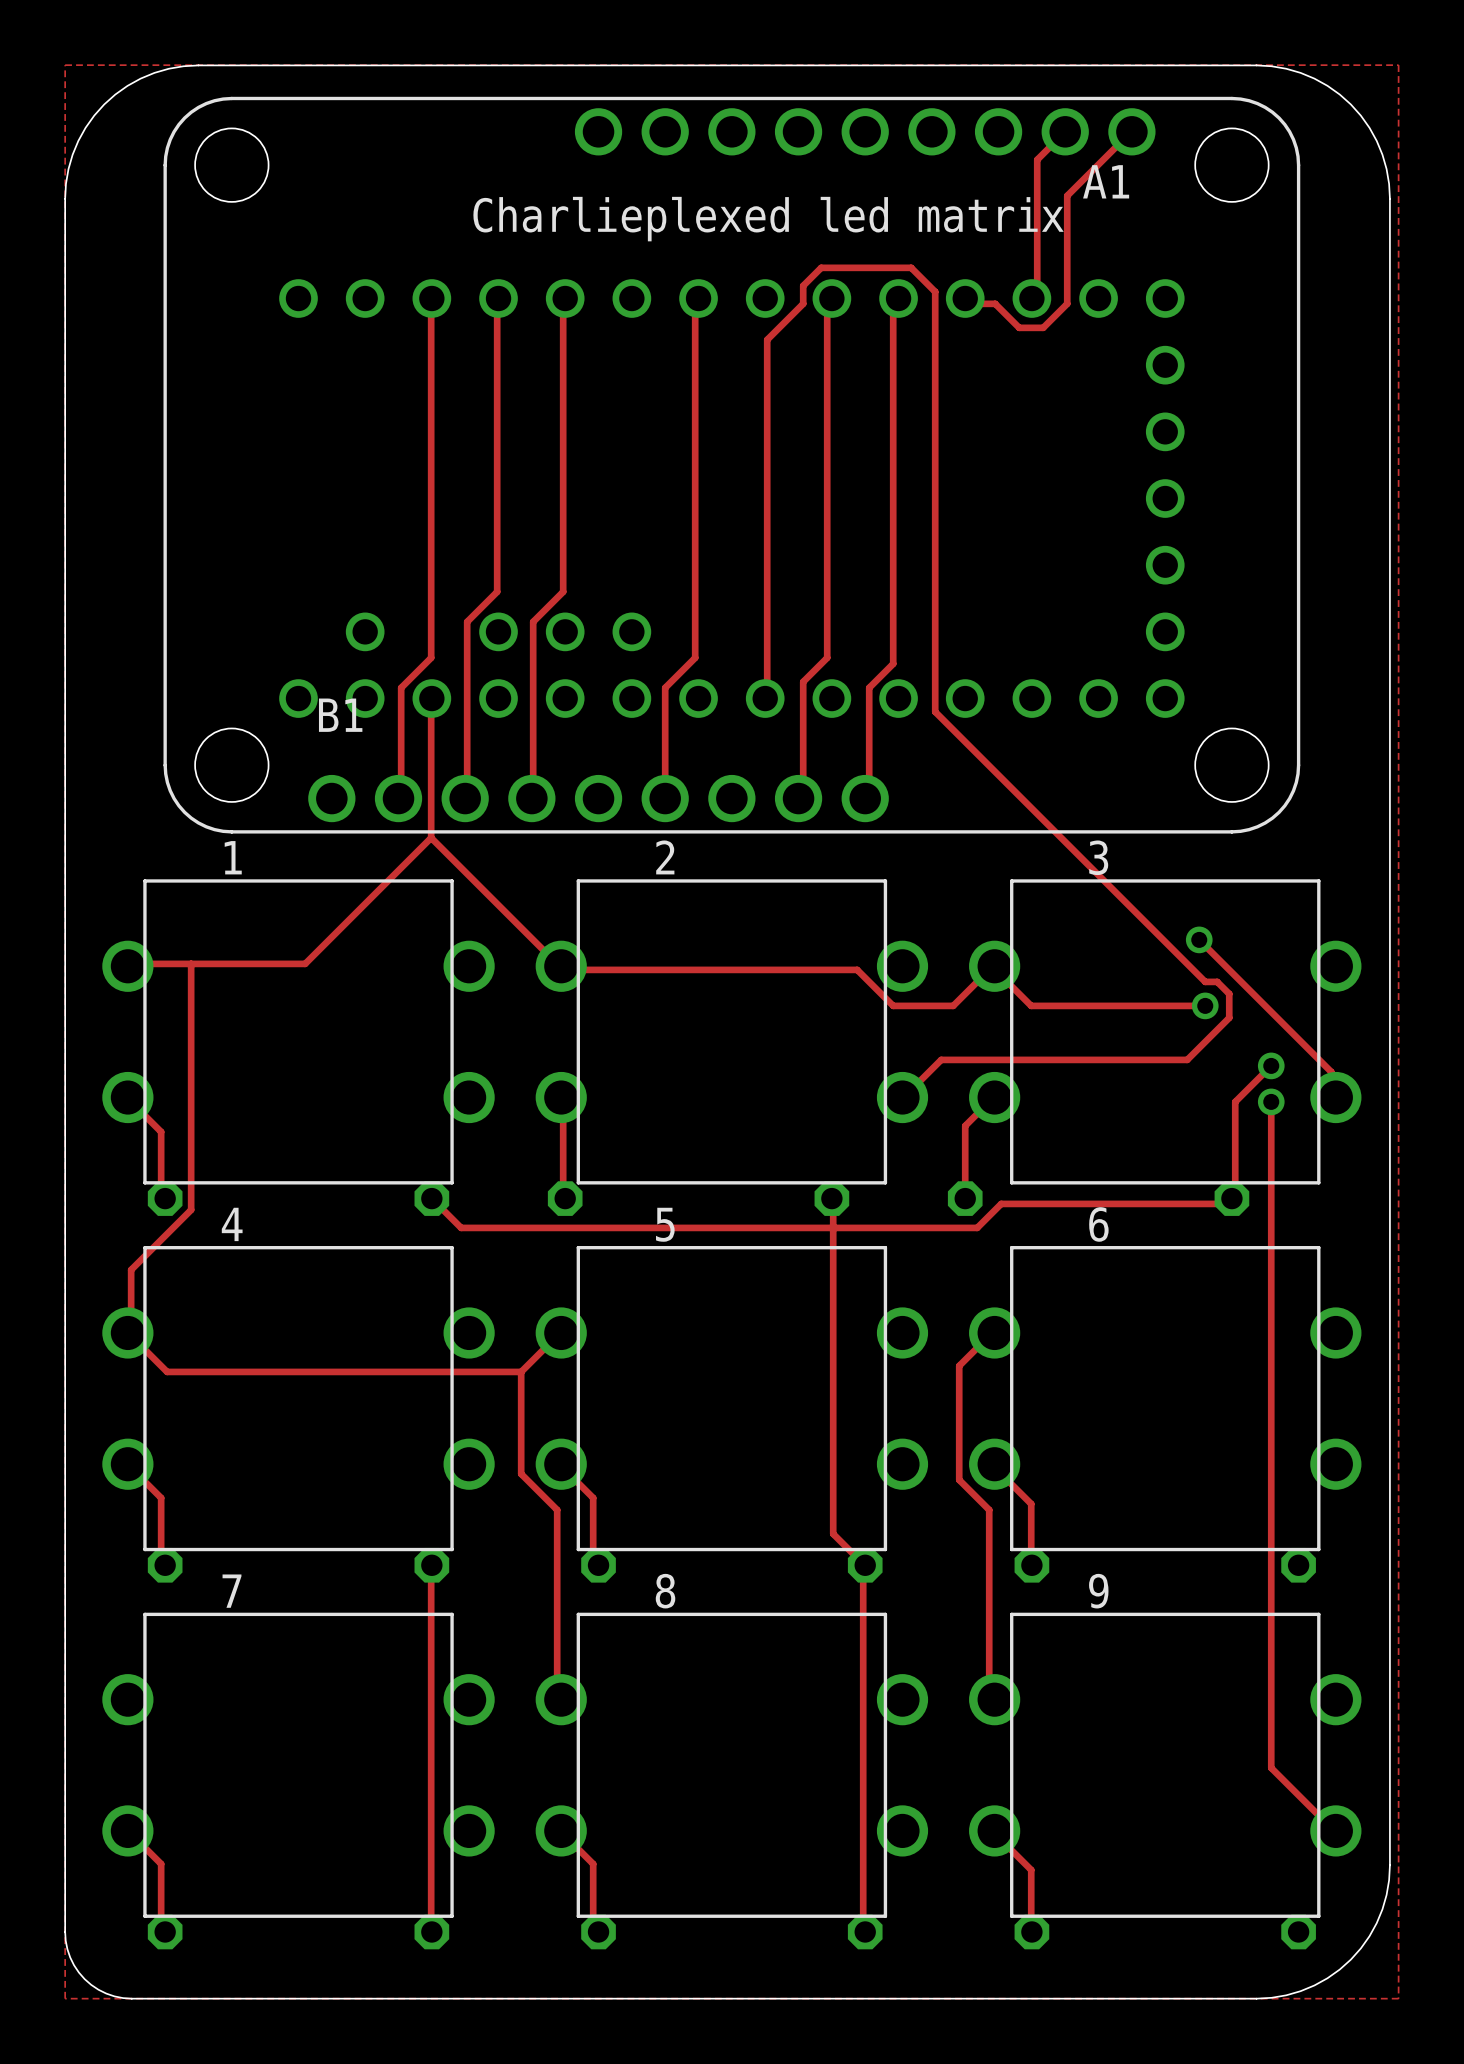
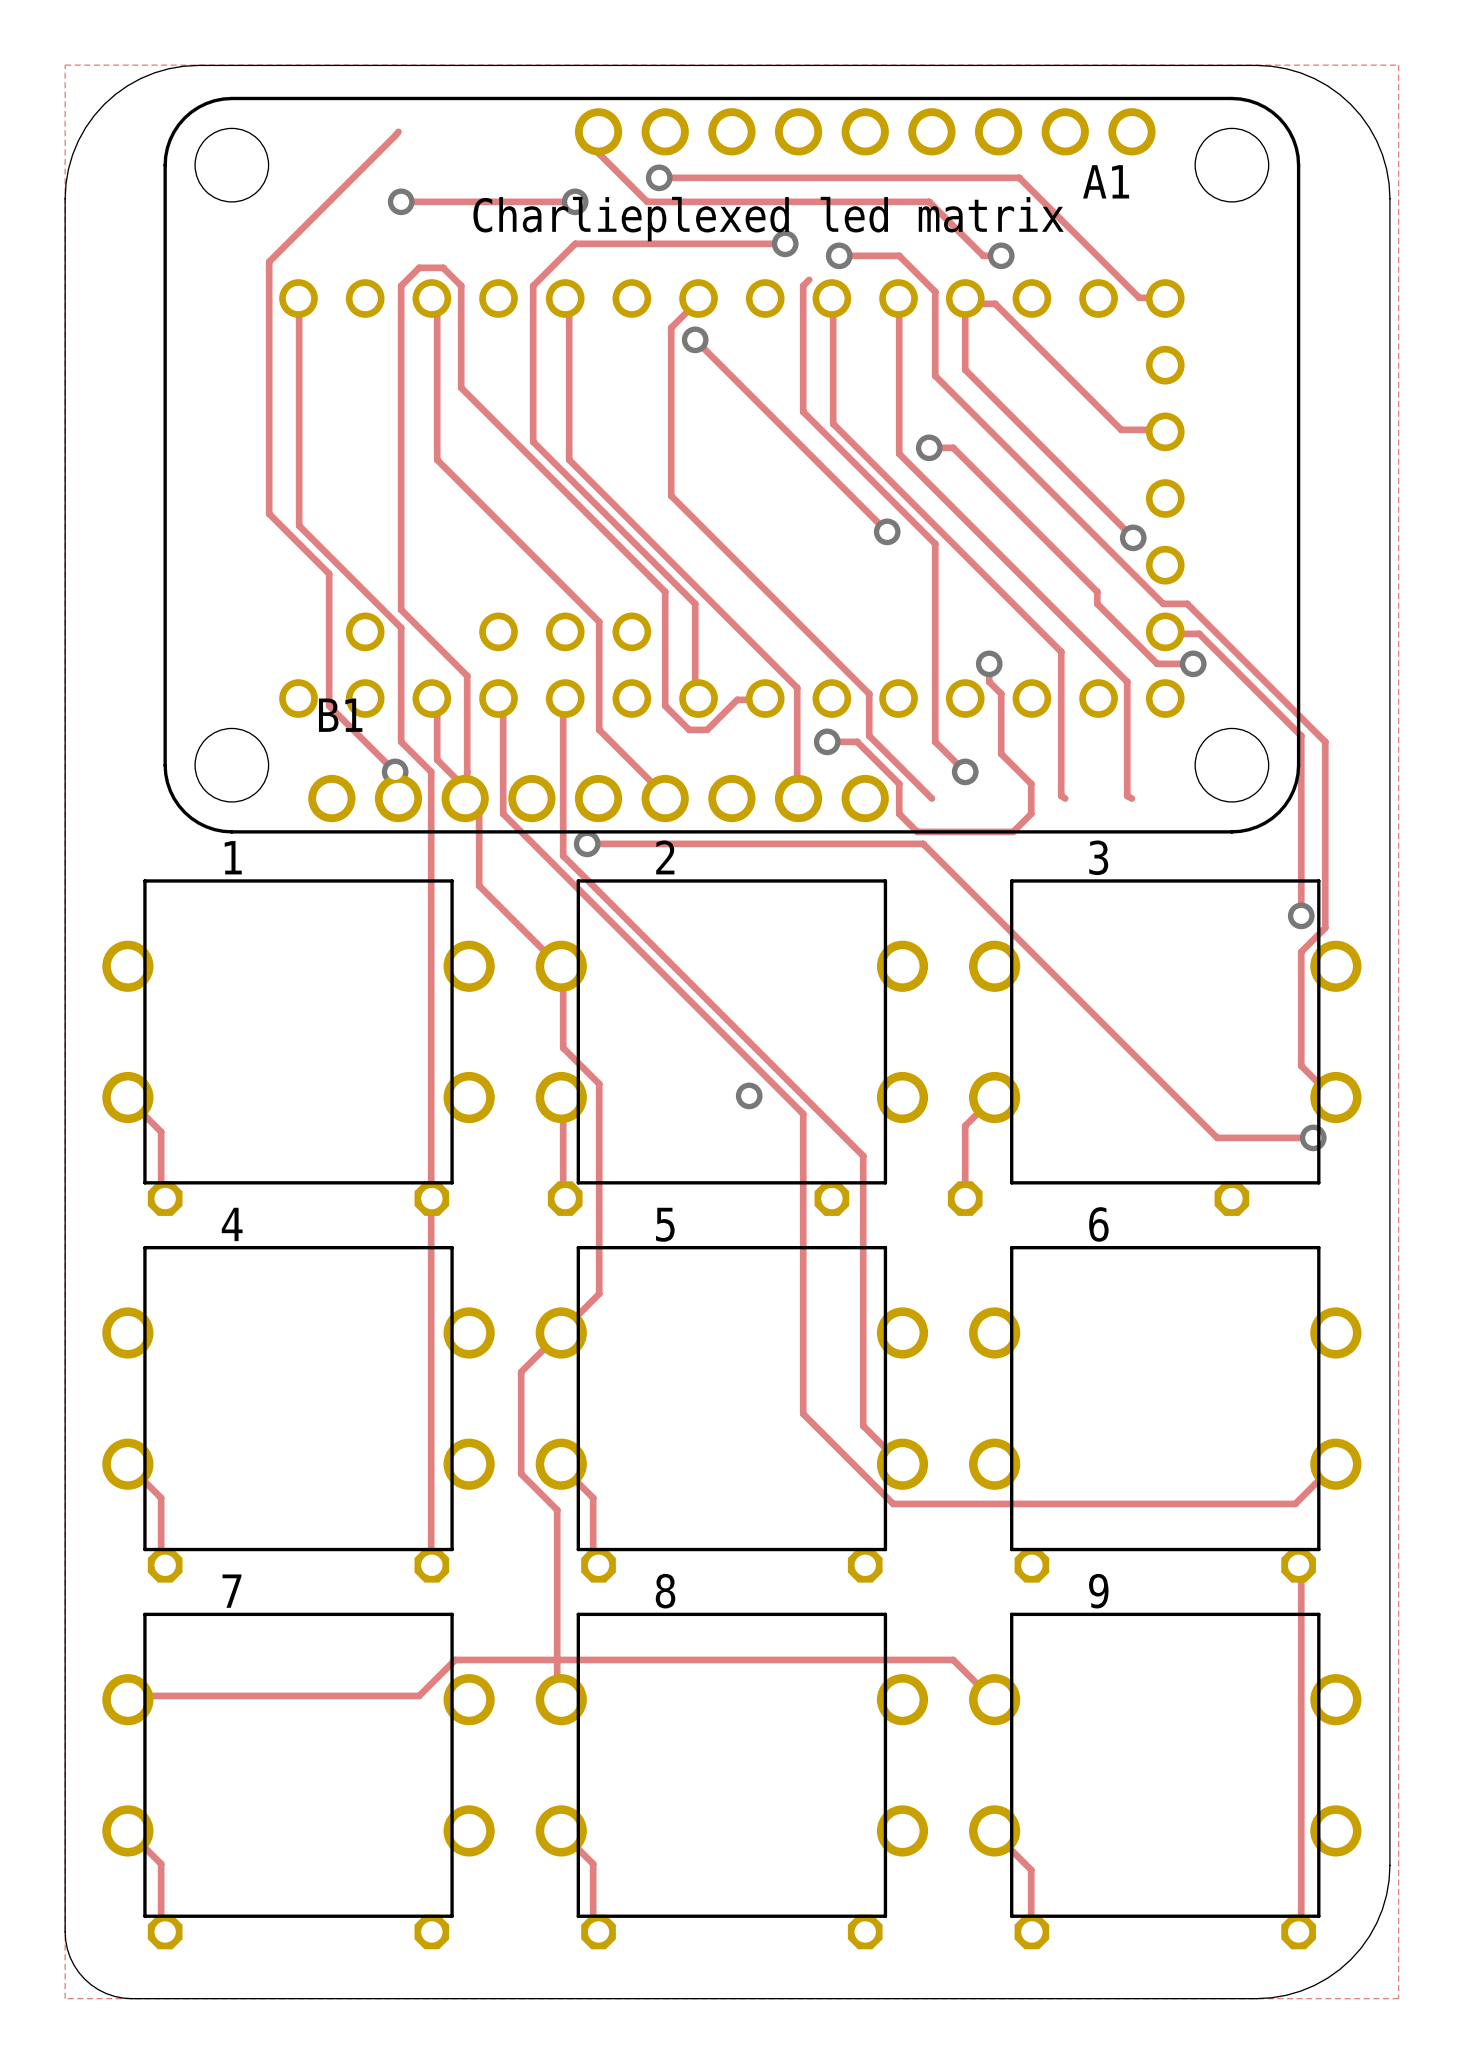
track: none -> (398, 131) (269, 261) (269, 513) (329, 573) (329, 705) (395, 771)
track: none -> (598, 131) (599, 153) (647, 201) (929, 201) (983, 255) (1001, 255)
track: (1065, 131) (1037, 159) (1037, 297) (1031, 298) -> none
track: (1131, 131) (1067, 195) (1067, 303) (1043, 327) (1019, 327) -> (1165, 431) (1163, 429) (1121, 429) (1019, 327)
track: none -> (659, 177) (1019, 177) (1139, 297) (1165, 298)
via: none -> (659, 177)
track: none -> (401, 201) (575, 201)
via: none -> (401, 201)
via: none -> (575, 201)
via: none -> (785, 243)
via: none -> (839, 255)
via: none -> (1001, 255)
track: (911, 267) (821, 267) (809, 279) -> (911, 267) (899, 255) (839, 255)
track: (431, 298) (431, 657) (401, 687) -> (298, 298) (299, 525) (401, 627) (401, 687)
track: none -> (431, 298) (437, 303) (437, 459) (599, 621) (599, 729) (665, 795)
track: (498, 298) (497, 591) (467, 621) (467, 675) -> (665, 687) (665, 591) (461, 387) (461, 285) (443, 267) (419, 267) (401, 285) (401, 609) (467, 675)
track: (565, 298) (563, 303) (563, 591) (533, 621) (531, 798) -> (565, 298) (569, 303) (569, 459) (797, 687) (798, 798)
track: (831, 298) (827, 303) (827, 657) (803, 681) (803, 795) (798, 798) -> (831, 298) (833, 423) (1061, 651) (1061, 795) (1065, 798)
track: (898, 298) (893, 303) (893, 663) (869, 687) (869, 693) -> (695, 303) (671, 327) (671, 495) (869, 693)
track: none -> (898, 298) (899, 453) (1127, 681) (1127, 795) (1131, 798)
track: (695, 303) (695, 603) -> (785, 243) (575, 243) (533, 285) (533, 441) (695, 603)
track: (803, 303) (767, 339) (767, 693) (765, 698) -> none
track: none -> (965, 303) (965, 369) (1133, 537)
track: none -> (695, 339) (887, 531)
via: none -> (695, 339)
track: (935, 375) (935, 543) -> (803, 303) (803, 411) (935, 543)
track: none -> (929, 447) (953, 447) (1097, 591) (1097, 603) (1157, 663) (1193, 663)
via: none -> (929, 447)
via: none -> (887, 531)
via: none -> (1133, 537)
track: none -> (1165, 631) (1169, 633) (1199, 633) (1301, 735) (1301, 915)
track: (695, 657) (665, 687) -> (695, 657) (695, 693) (698, 698)
track: none -> (989, 663) (989, 681) (1001, 693) (1001, 753) (1031, 783) (1031, 813) (1013, 831) (917, 831) (899, 813) (899, 783) (857, 741) (827, 741)
via: none -> (989, 663)
via: none -> (1193, 663)
track: (431, 698) (431, 771) -> (431, 698) (437, 699) (437, 759) (479, 801) (479, 885)
track: none -> (498, 698) (503, 699) (503, 813) (803, 1113) (803, 1413) (893, 1503) (1295, 1503) (1335, 1464)
track: none -> (565, 698) (563, 699) (563, 855) (863, 1155) (863, 1425) (902, 1464)
track: (665, 705) (665, 795) -> (665, 705) (689, 729) (707, 729) (737, 699) (765, 698)
track: (935, 711) (1205, 981) (1217, 981) (1229, 993) (1229, 1017) (1187, 1059) (941, 1059) (902, 1097) -> (935, 711) (935, 741) (965, 771)
track: (869, 735) (869, 795) (865, 798) -> (869, 735) (931, 798)
track: (401, 741) (401, 795) (398, 798) -> (401, 741) (431, 771)
via: none -> (827, 741)
via: none -> (395, 771)
via: none -> (965, 771)
track: none -> (587, 843) (923, 843) (1217, 1137) (1313, 1137)
via: none -> (587, 843)
track: (479, 885) (431, 837) (305, 963) (131, 963) (127, 966) -> none
via: none -> (1301, 915)
track: (1199, 939) (1331, 1071) (1331, 1095) -> (935, 375) (1163, 603) (1187, 603) (1325, 741) (1325, 927) (1301, 951) (1301, 1065) (1331, 1095)
via: (1199, 939) -> none
track: (191, 963) (191, 1209) (131, 1269) (131, 1329) (127, 1332) (167, 1371) (521, 1371) -> none
track: (563, 969) (857, 969) (893, 1005) (953, 1005) (994, 966) (995, 969) (1031, 1005) (1205, 1005) -> (563, 969) (563, 1047) (599, 1083) (599, 1293) (561, 1332)
via: (1205, 1005) -> none
track: (1271, 1065) (1235, 1101) (1235, 1197) (1231, 1198) (1229, 1203) (1001, 1203) (977, 1227) (461, 1227) (431, 1198) -> none
via: (1271, 1065) -> none
via: none -> (749, 1095)
track: (1271, 1101) (1271, 1767) (1335, 1830) -> none
via: (1271, 1101) -> none
via: none -> (1313, 1137)
track: (831, 1198) (833, 1533) (865, 1565) (863, 1569) (863, 1929) (865, 1931) -> none
track: (994, 1332) (989, 1335) (959, 1365) (959, 1479) (989, 1509) (989, 1695) -> (127, 1699) (131, 1695) (419, 1695) (455, 1659) (953, 1659) (989, 1695)
track: (994, 1464) (995, 1467) (1031, 1503) (1031, 1565) -> none
track: (431, 1565) (431, 1931) -> (431, 1565) (431, 837)
track: none -> (1298, 1565) (1301, 1569) (1301, 1929) (1298, 1931)

